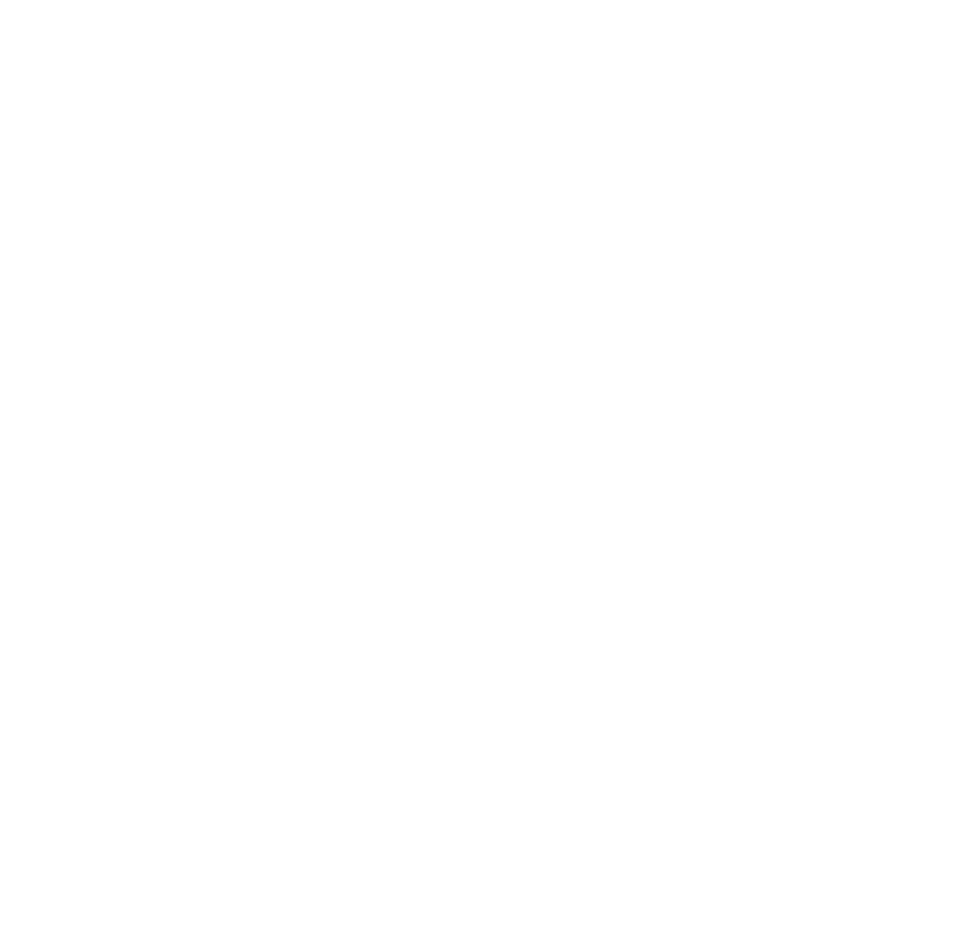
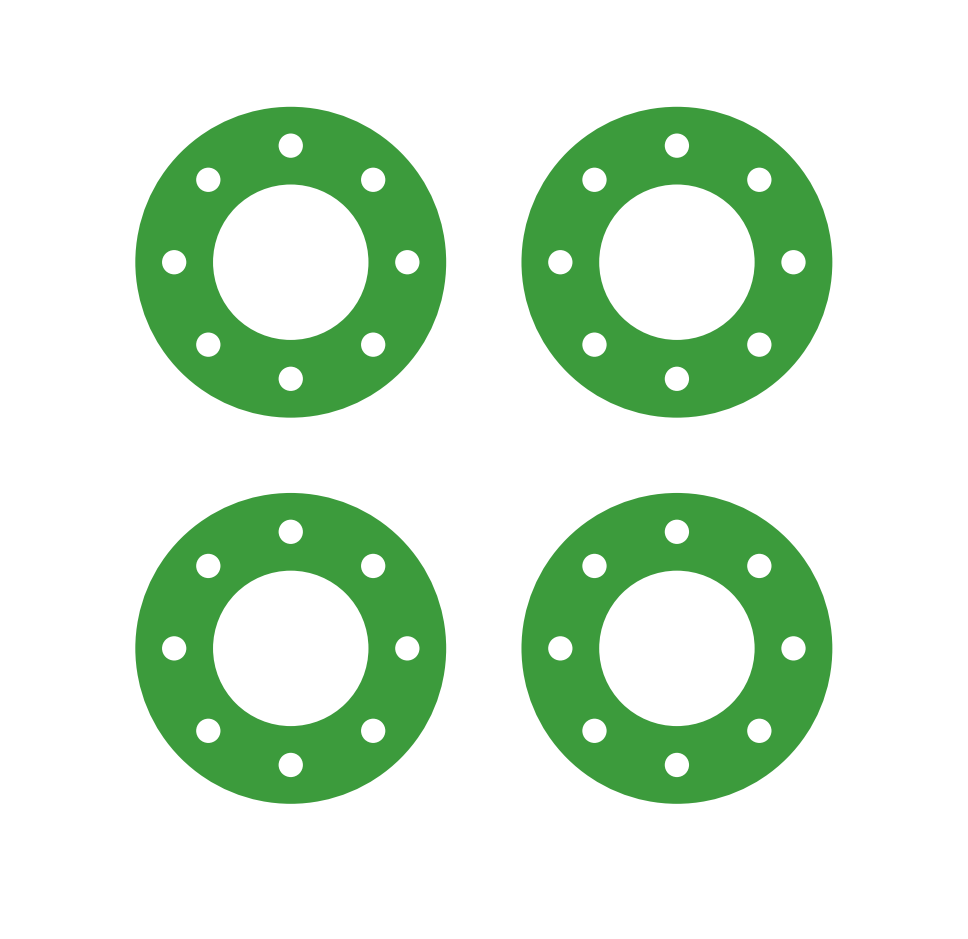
part: none -> (290, 262)
part: none -> (676, 262)
part: none -> (290, 648)
part: none -> (676, 648)

